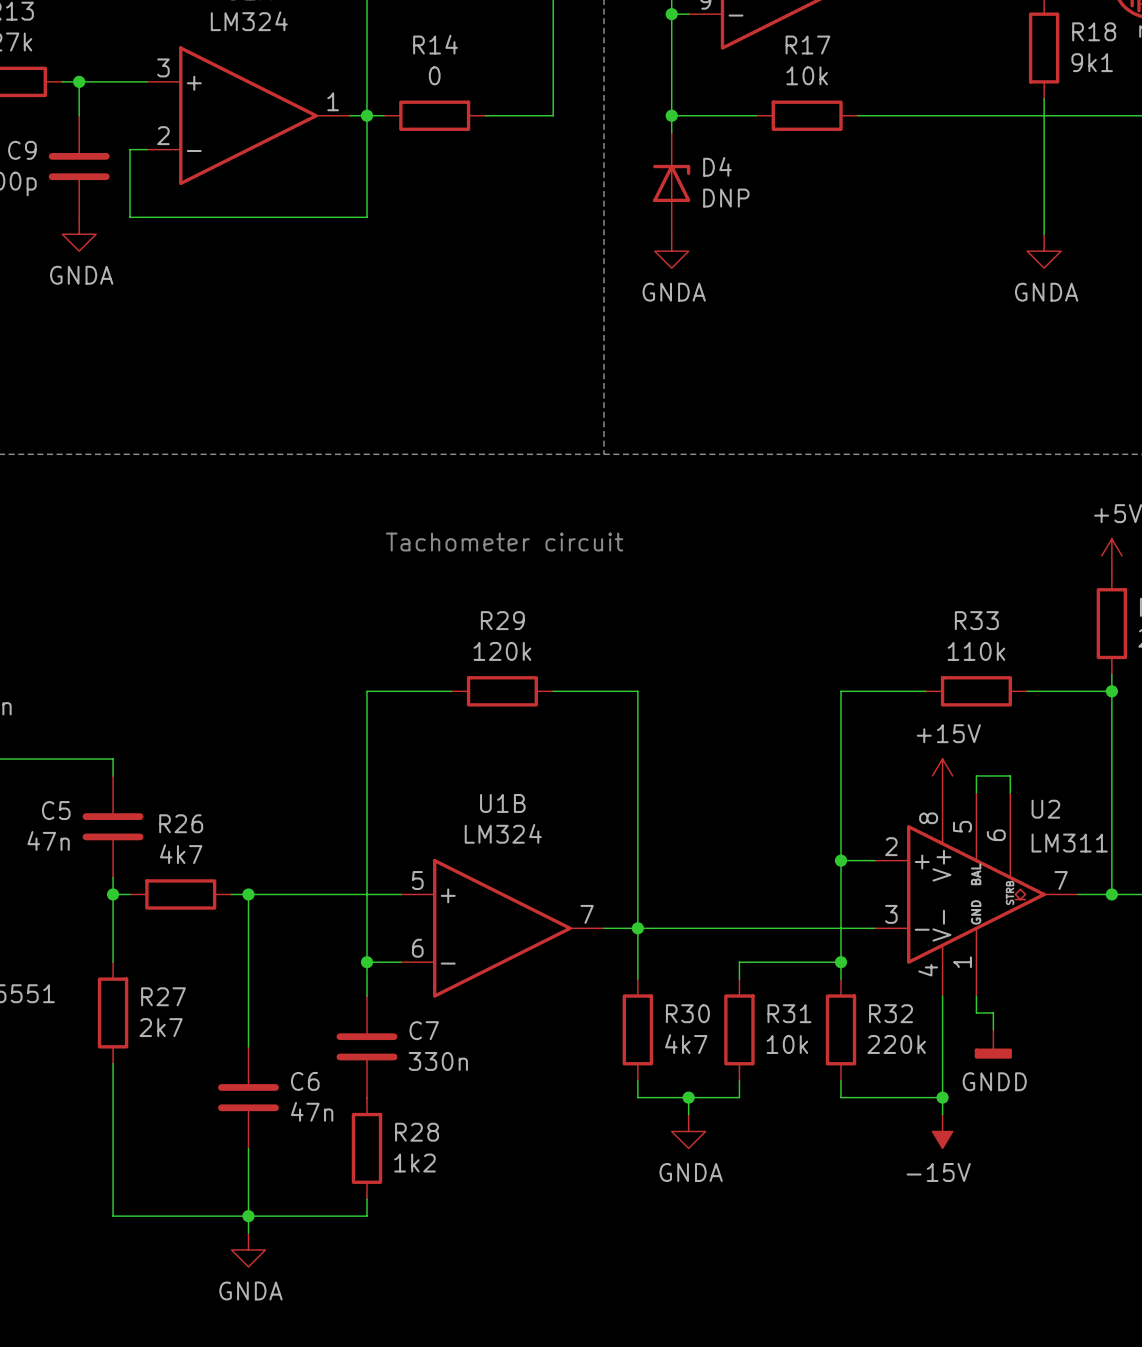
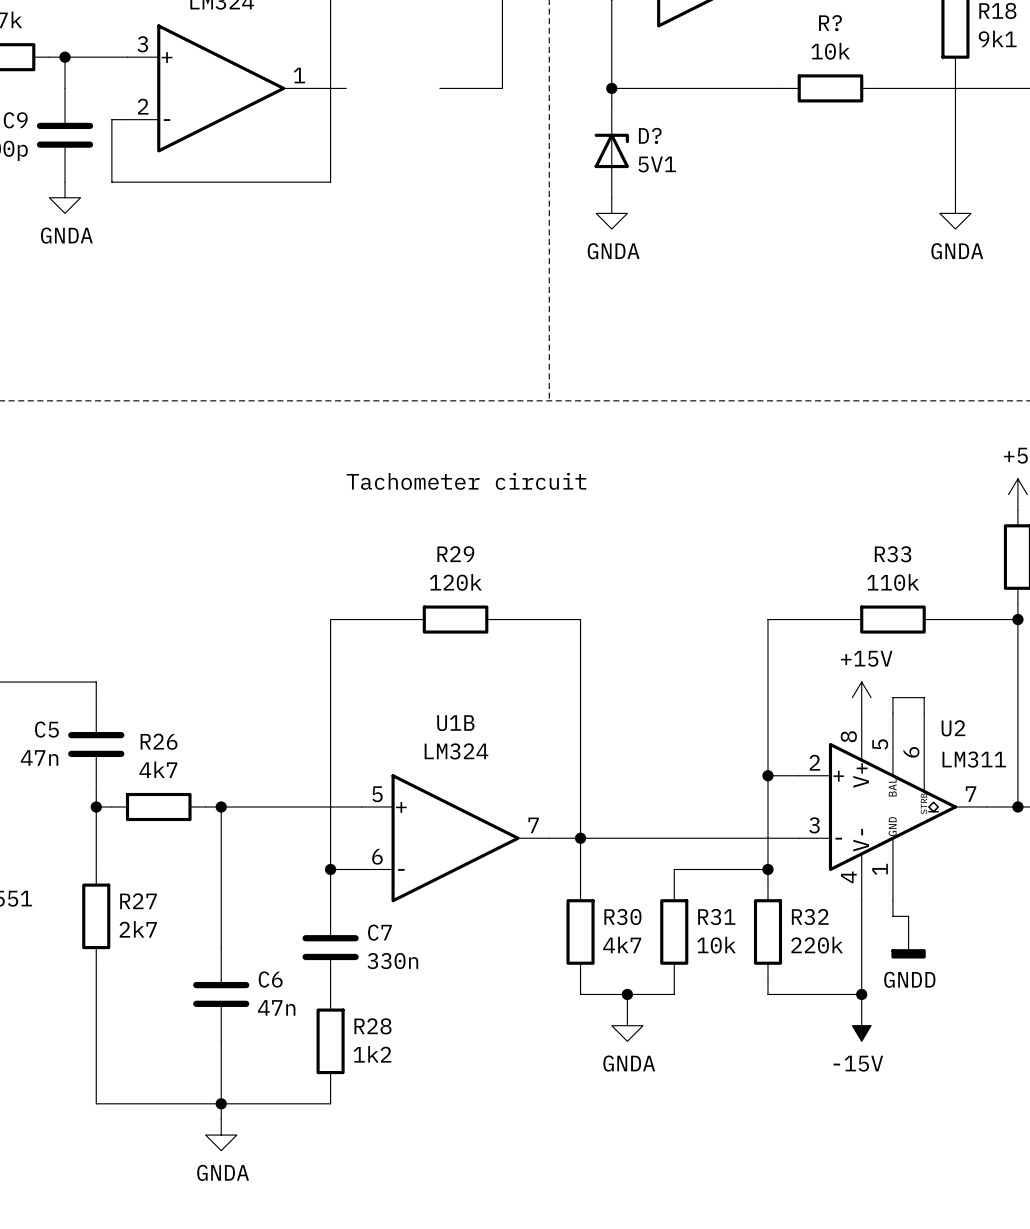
junction: (366, 115) -> none
R14: 0 (434, 115) -> none
R17: 10k (807, 115) -> none
wire: (857, 115) (959, 115) -> (783, 88) (689, 88)
R?: none -> 10k (830, 88)
D4 name: D4 (717, 166) -> D? (650, 135)
D4 value: DNP (726, 198) -> 5V1 (657, 164)

